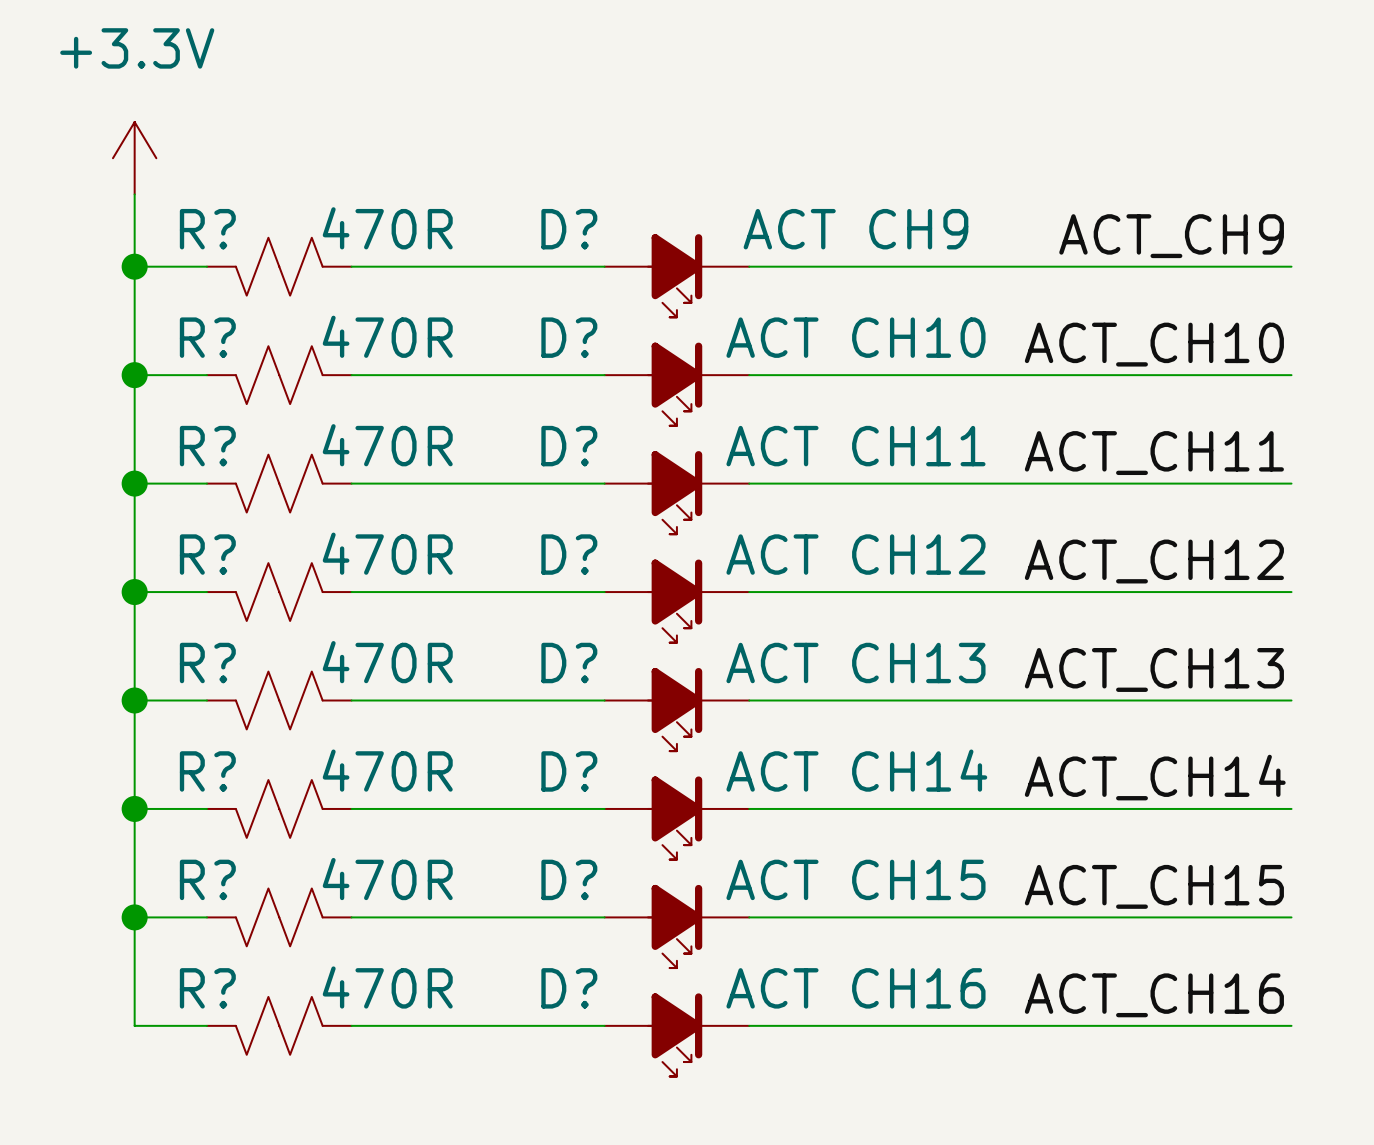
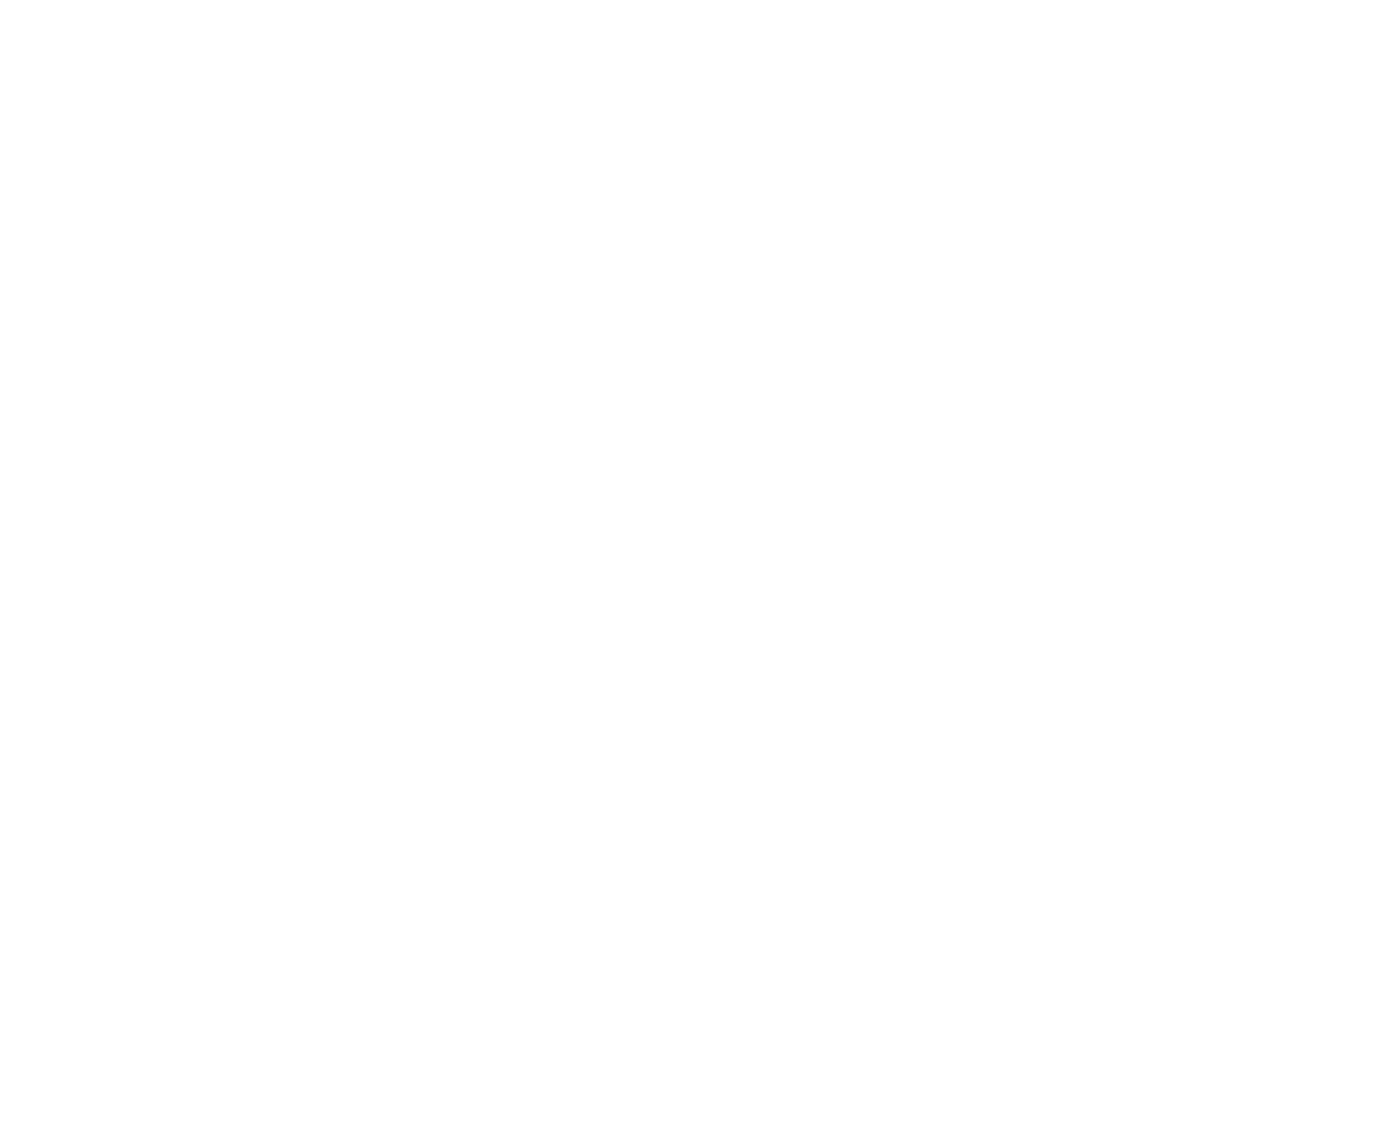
power symbol: +3.3V (134, 158) -> none
wire: (134, 194) (134, 1025) (206, 1025) -> none
label: ACT_CH9 (1171, 236) -> none
wire: (134, 266) (206, 266) -> none
junction: (134, 266) -> none
R?: 470R (279, 266) -> none
wire: (351, 266) (604, 266) -> none
wire: (749, 266) (1291, 266) -> none
D?: ACT CH9 (676, 275) -> none
label: ACT_CH10 (1154, 344) -> none
wire: (134, 375) (206, 375) -> none
junction: (134, 375) -> none
R?: 470R (279, 375) -> none
wire: (351, 375) (604, 375) -> none
wire: (749, 375) (1291, 375) -> none
D?: ACT CH10 (676, 384) -> none
label: ACT_CH11 (1154, 453) -> none
wire: (134, 483) (206, 483) -> none
junction: (134, 483) -> none
R?: 470R (279, 483) -> none
wire: (351, 483) (604, 483) -> none
wire: (749, 483) (1291, 483) -> none
D?: ACT CH11 (676, 492) -> none
label: ACT_CH12 (1154, 561) -> none
wire: (134, 592) (206, 592) -> none
junction: (134, 592) -> none
R?: 470R (279, 592) -> none
wire: (351, 592) (604, 592) -> none
wire: (749, 592) (1291, 592) -> none
D?: ACT CH12 (676, 601) -> none
label: ACT_CH13 (1154, 669) -> none
wire: (134, 700) (206, 700) -> none
junction: (134, 700) -> none
R?: 470R (279, 700) -> none
wire: (351, 700) (604, 700) -> none
wire: (749, 700) (1291, 700) -> none
D?: ACT CH13 (676, 709) -> none
label: ACT_CH14 (1155, 777) -> none
wire: (134, 808) (206, 808) -> none
junction: (134, 808) -> none
R?: 470R (279, 808) -> none
wire: (351, 808) (604, 808) -> none
wire: (749, 808) (1291, 808) -> none
D?: ACT CH14 (676, 818) -> none
label: ACT_CH15 (1154, 886) -> none
wire: (134, 917) (206, 917) -> none
junction: (134, 917) -> none
R?: 470R (279, 917) -> none
wire: (351, 917) (604, 917) -> none
wire: (749, 917) (1291, 917) -> none
D?: ACT CH15 (676, 926) -> none
label: ACT_CH16 (1154, 995) -> none
R?: 470R (279, 1025) -> none
wire: (351, 1025) (604, 1025) -> none
wire: (749, 1025) (1291, 1025) -> none
D?: ACT CH16 (676, 1034) -> none

